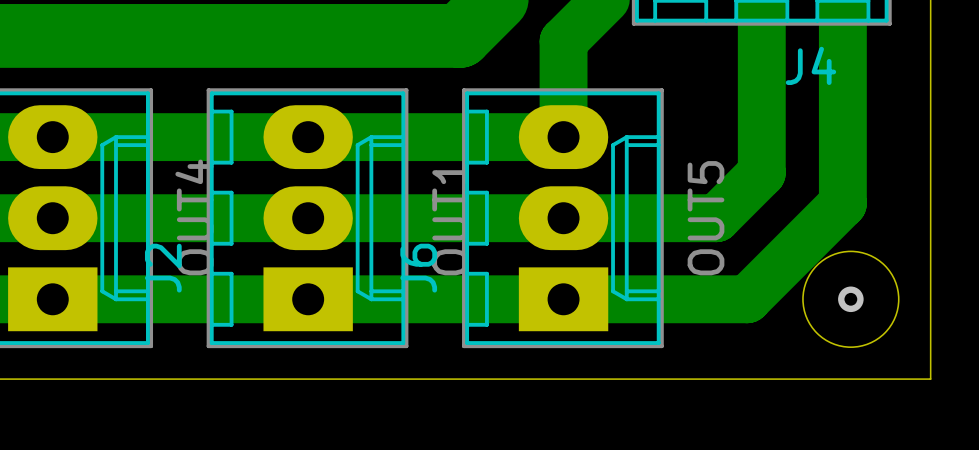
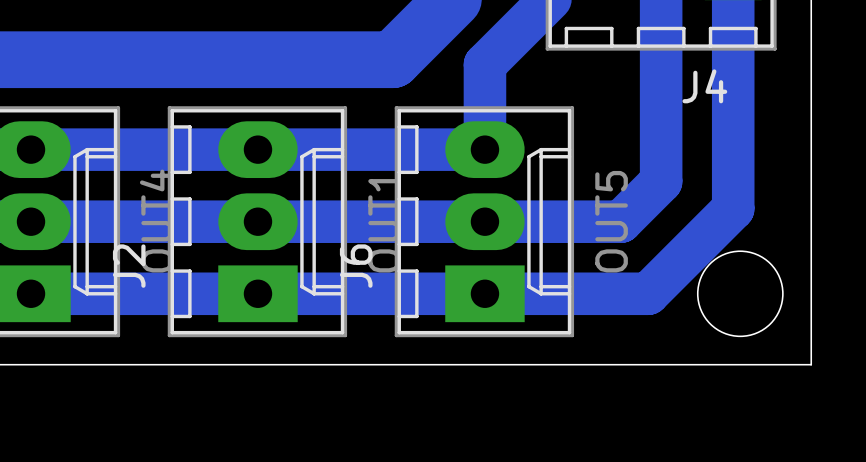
via: (850, 299) -> none

